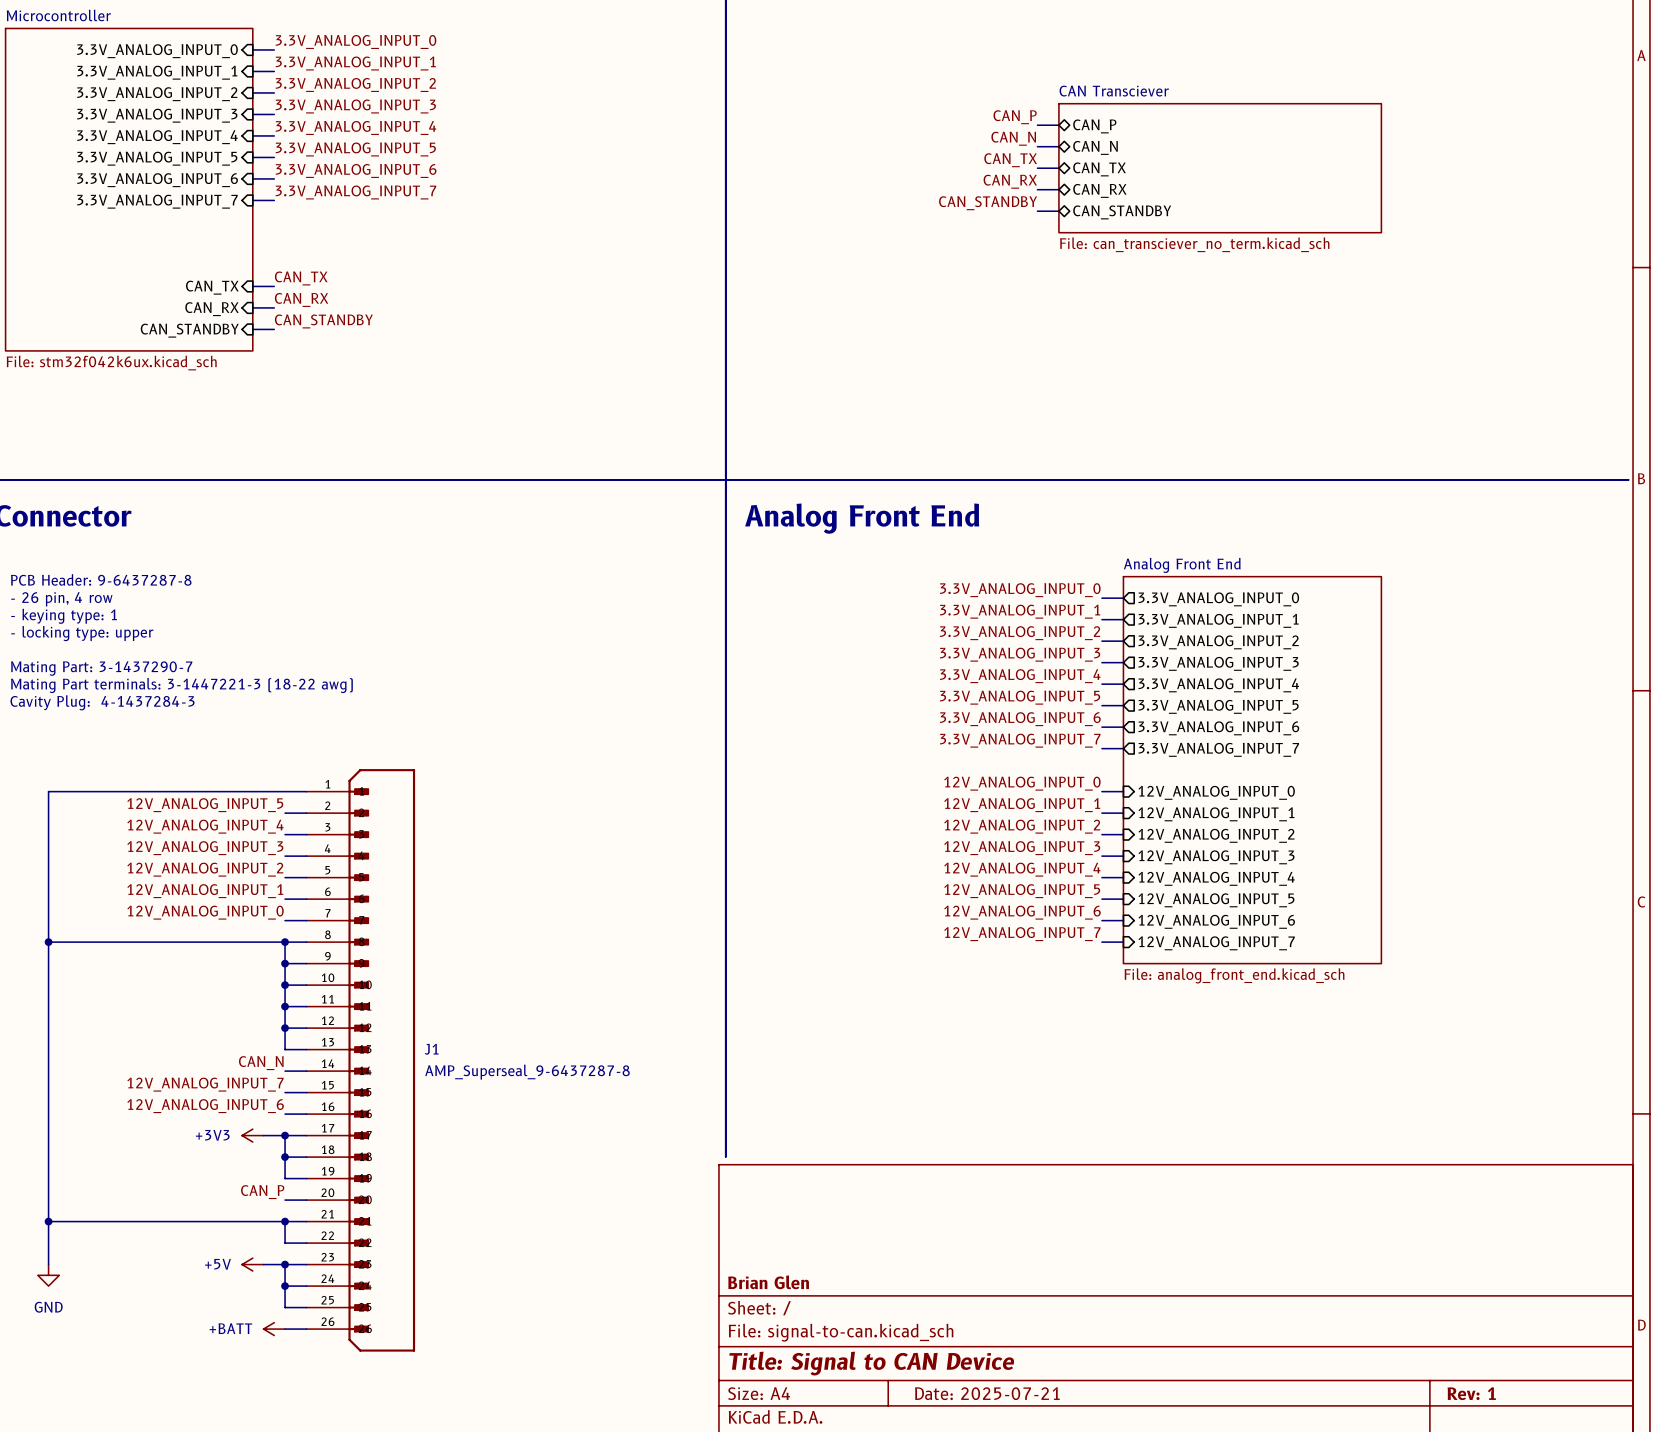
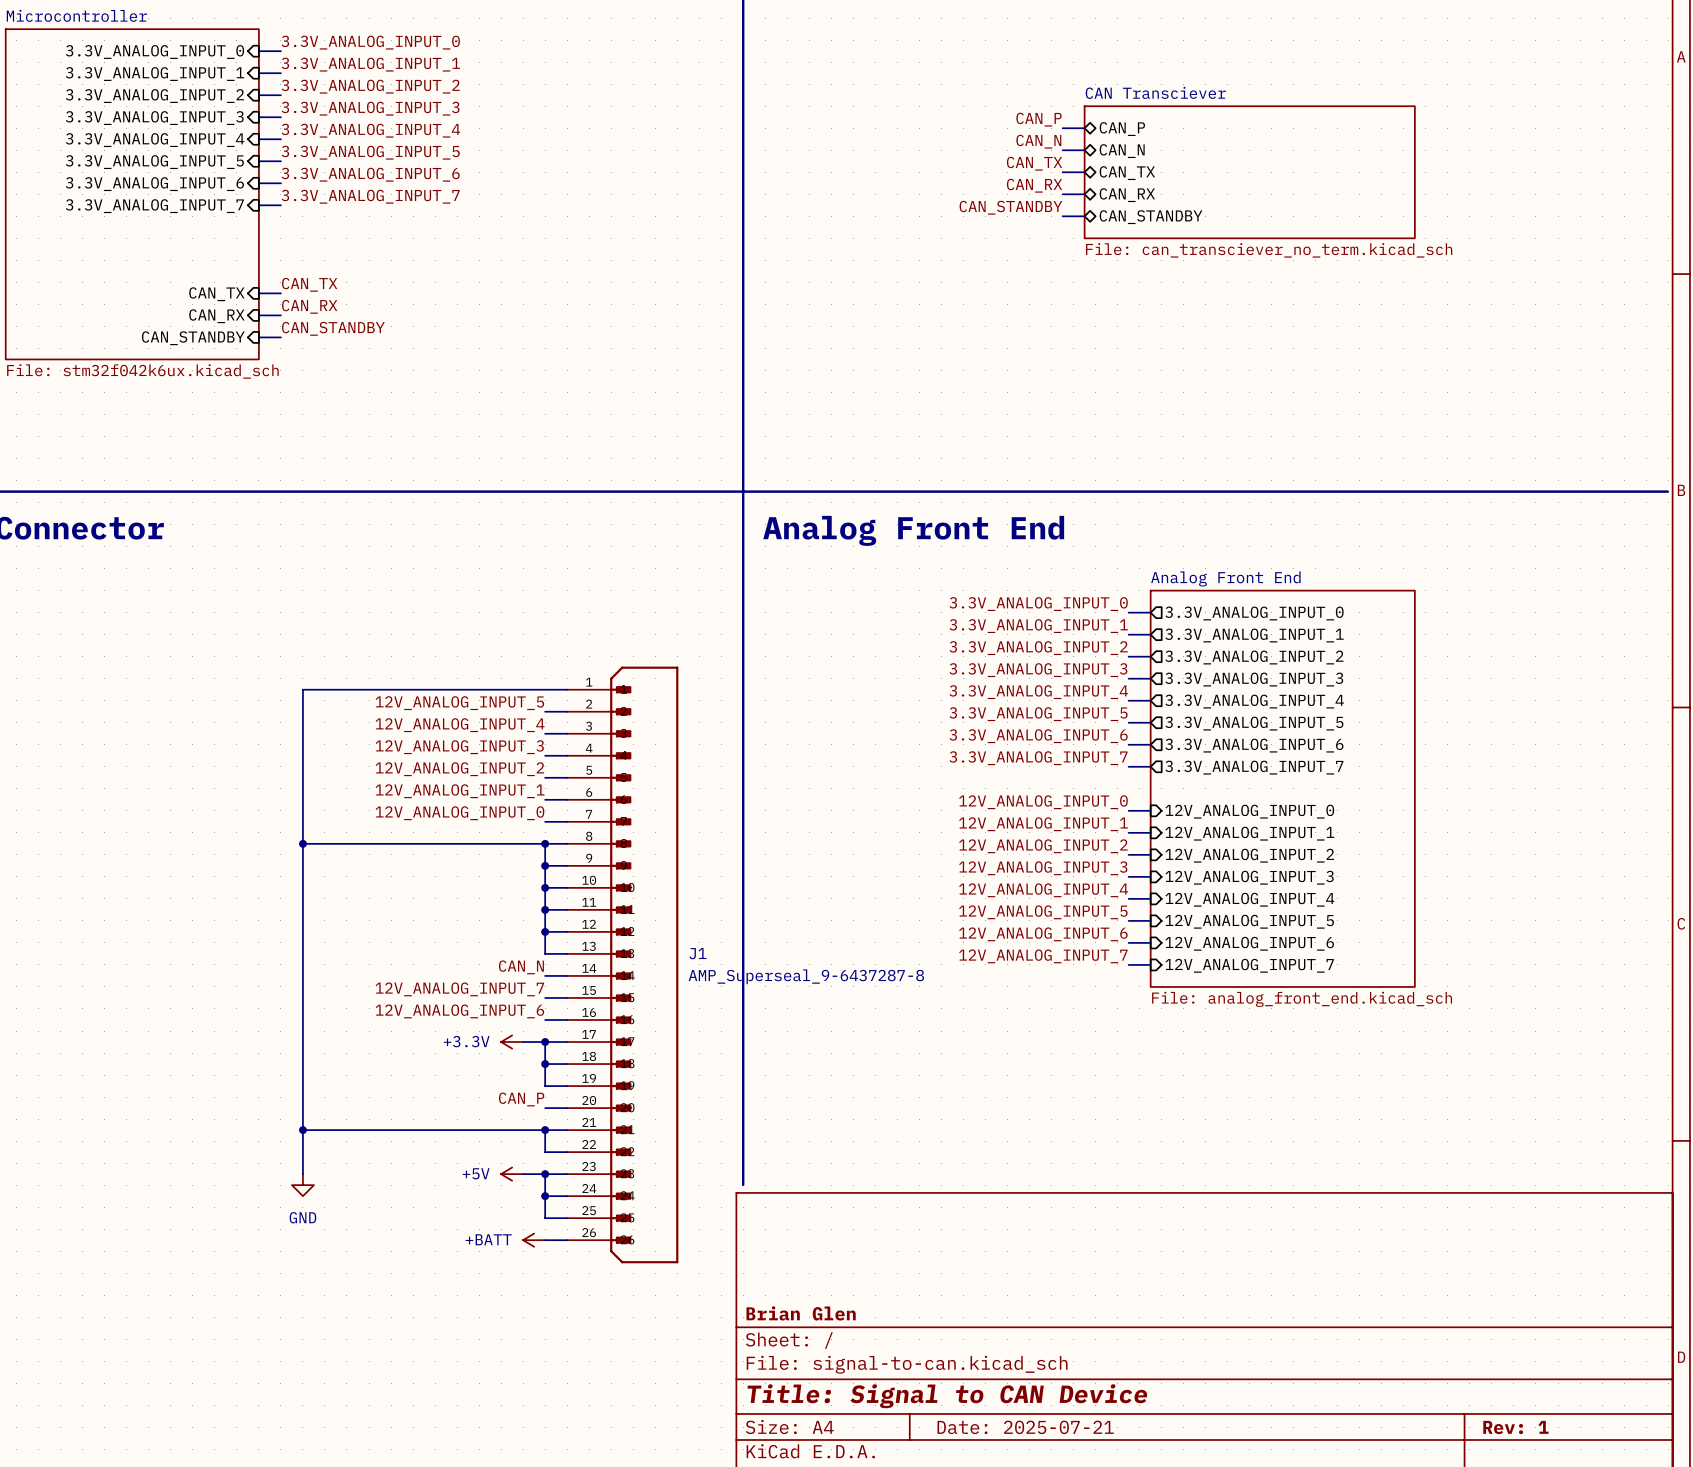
text: PCB Header: 9-6437287-8 (101, 579) -> none
text: - 26 pin, 4 row (61, 599) -> none
text: - keying type: 1 (64, 616) -> none
text: - locking type: upper (82, 633) -> none
text: Mating Part: 3-1437290-7 (101, 668) -> none
wire: none -> (567, 689) (302, 689) (302, 1174)
text: Mating Part terminals: 3-1447221-3 (18-22 awg) (181, 685) -> none
label: none -> 12V_ANALOG_INPUT_5 (459, 703)
wire: none -> (545, 711) (567, 711)
text: Cavity Plug: 4-1437284-3 (102, 702) -> none
label: none -> 12V_ANALOG_INPUT_4 (460, 725)
wire: none -> (545, 733) (567, 733)
label: none -> 12V_ANALOG_INPUT_3 (459, 747)
wire: none -> (545, 755) (567, 755)
label: none -> 12V_ANALOG_INPUT_2 (459, 769)
wire: none -> (545, 777) (567, 777)
label: none -> 12V_ANALOG_INPUT_1 (460, 791)
wire: none -> (545, 799) (567, 799)
wire: (306, 791) (48, 791) (48, 1264) -> none
label: none -> 12V_ANALOG_INPUT_0 (459, 813)
wire: none -> (545, 821) (567, 821)
label: 12V_ANALOG_INPUT_5 (205, 805) -> none
wire: (285, 813) (306, 813) -> none
wire: none -> (302, 843) (567, 843)
junction: none -> (302, 843)
wire: none -> (545, 843) (545, 953) (567, 953)
junction: none -> (545, 843)
label: 12V_ANALOG_INPUT_4 (205, 826) -> none
wire: (285, 834) (306, 834) -> none
wire: none -> (545, 865) (567, 865)
junction: none -> (545, 865)
label: 12V_ANALOG_INPUT_3 (205, 848) -> none
wire: (285, 856) (306, 856) -> none
wire: none -> (545, 887) (567, 887)
junction: none -> (545, 887)
label: 12V_ANALOG_INPUT_2 (205, 869) -> none
wire: (285, 877) (306, 877) -> none
wire: none -> (545, 909) (567, 909)
junction: none -> (545, 909)
label: 12V_ANALOG_INPUT_1 (205, 891) -> none
wire: (285, 899) (306, 899) -> none
wire: none -> (545, 931) (567, 931)
junction: none -> (545, 931)
label: 12V_ANALOG_INPUT_0 (205, 912) -> none
wire: (285, 920) (306, 920) -> none
wire: (48, 942) (306, 942) -> none
junction: (48, 942) -> none
wire: (285, 942) (285, 1049) (306, 1049) -> none
junction: (285, 942) -> none
label: none -> CAN_N (521, 967)
wire: none -> (545, 975) (567, 975)
wire: (285, 963) (306, 963) -> none
junction: (285, 963) -> none
label: none -> 12V_ANALOG_INPUT_7 (459, 989)
wire: none -> (545, 997) (567, 997)
wire: (285, 985) (306, 985) -> none
junction: (285, 985) -> none
label: none -> 12V_ANALOG_INPUT_6 (459, 1011)
wire: none -> (545, 1020) (567, 1020)
wire: (285, 1006) (306, 1006) -> none
junction: (285, 1006) -> none
power symbol: none -> +3.3V (512, 1042)
wire: none -> (523, 1042) (567, 1042)
wire: none -> (545, 1042) (545, 1086) (567, 1086)
junction: none -> (545, 1042)
wire: (285, 1028) (306, 1028) -> none
junction: (285, 1028) -> none
wire: none -> (545, 1064) (567, 1064)
junction: none -> (545, 1064)
J1 position: (360, 1060) -> (622, 964)
label: CAN_N (261, 1063) -> none
wire: (285, 1071) (306, 1071) -> none
label: none -> CAN_P (521, 1099)
wire: none -> (545, 1108) (567, 1108)
label: 12V_ANALOG_INPUT_7 (205, 1084) -> none
wire: (285, 1092) (306, 1092) -> none
wire: none -> (302, 1130) (567, 1130)
junction: none -> (302, 1130)
wire: none -> (545, 1130) (545, 1152) (567, 1152)
junction: none -> (545, 1130)
label: 12V_ANALOG_INPUT_6 (205, 1106) -> none
wire: (285, 1114) (306, 1114) -> none
power symbol: +3V3 (252, 1135) -> none
wire: (263, 1135) (306, 1135) -> none
wire: (285, 1135) (285, 1178) (306, 1178) -> none
junction: (285, 1135) -> none
power symbol: none -> +5V (512, 1174)
wire: none -> (523, 1174) (567, 1174)
wire: none -> (545, 1174) (545, 1218) (567, 1218)
junction: none -> (545, 1174)
junction: (285, 1157) -> none
power symbol: none -> GND (302, 1185)
wire: none -> (545, 1196) (567, 1196)
junction: none -> (545, 1196)
label: CAN_P (262, 1192) -> none
wire: (285, 1200) (306, 1200) -> none
power symbol: none -> +BATT (534, 1240)
wire: none -> (545, 1240) (567, 1240)
wire: (48, 1221) (306, 1221) -> none
junction: (48, 1221) -> none
wire: (285, 1221) (285, 1243) (306, 1243) -> none
junction: (285, 1221) -> none
power symbol: +5V (252, 1264) -> none
wire: (263, 1264) (306, 1264) -> none
wire: (285, 1264) (285, 1307) (306, 1307) -> none
junction: (285, 1264) -> none
power symbol: GND (48, 1275) -> none
wire: (285, 1286) (306, 1286) -> none
junction: (285, 1286) -> none
power symbol: +BATT (274, 1329) -> none
wire: (285, 1329) (306, 1329) -> none

